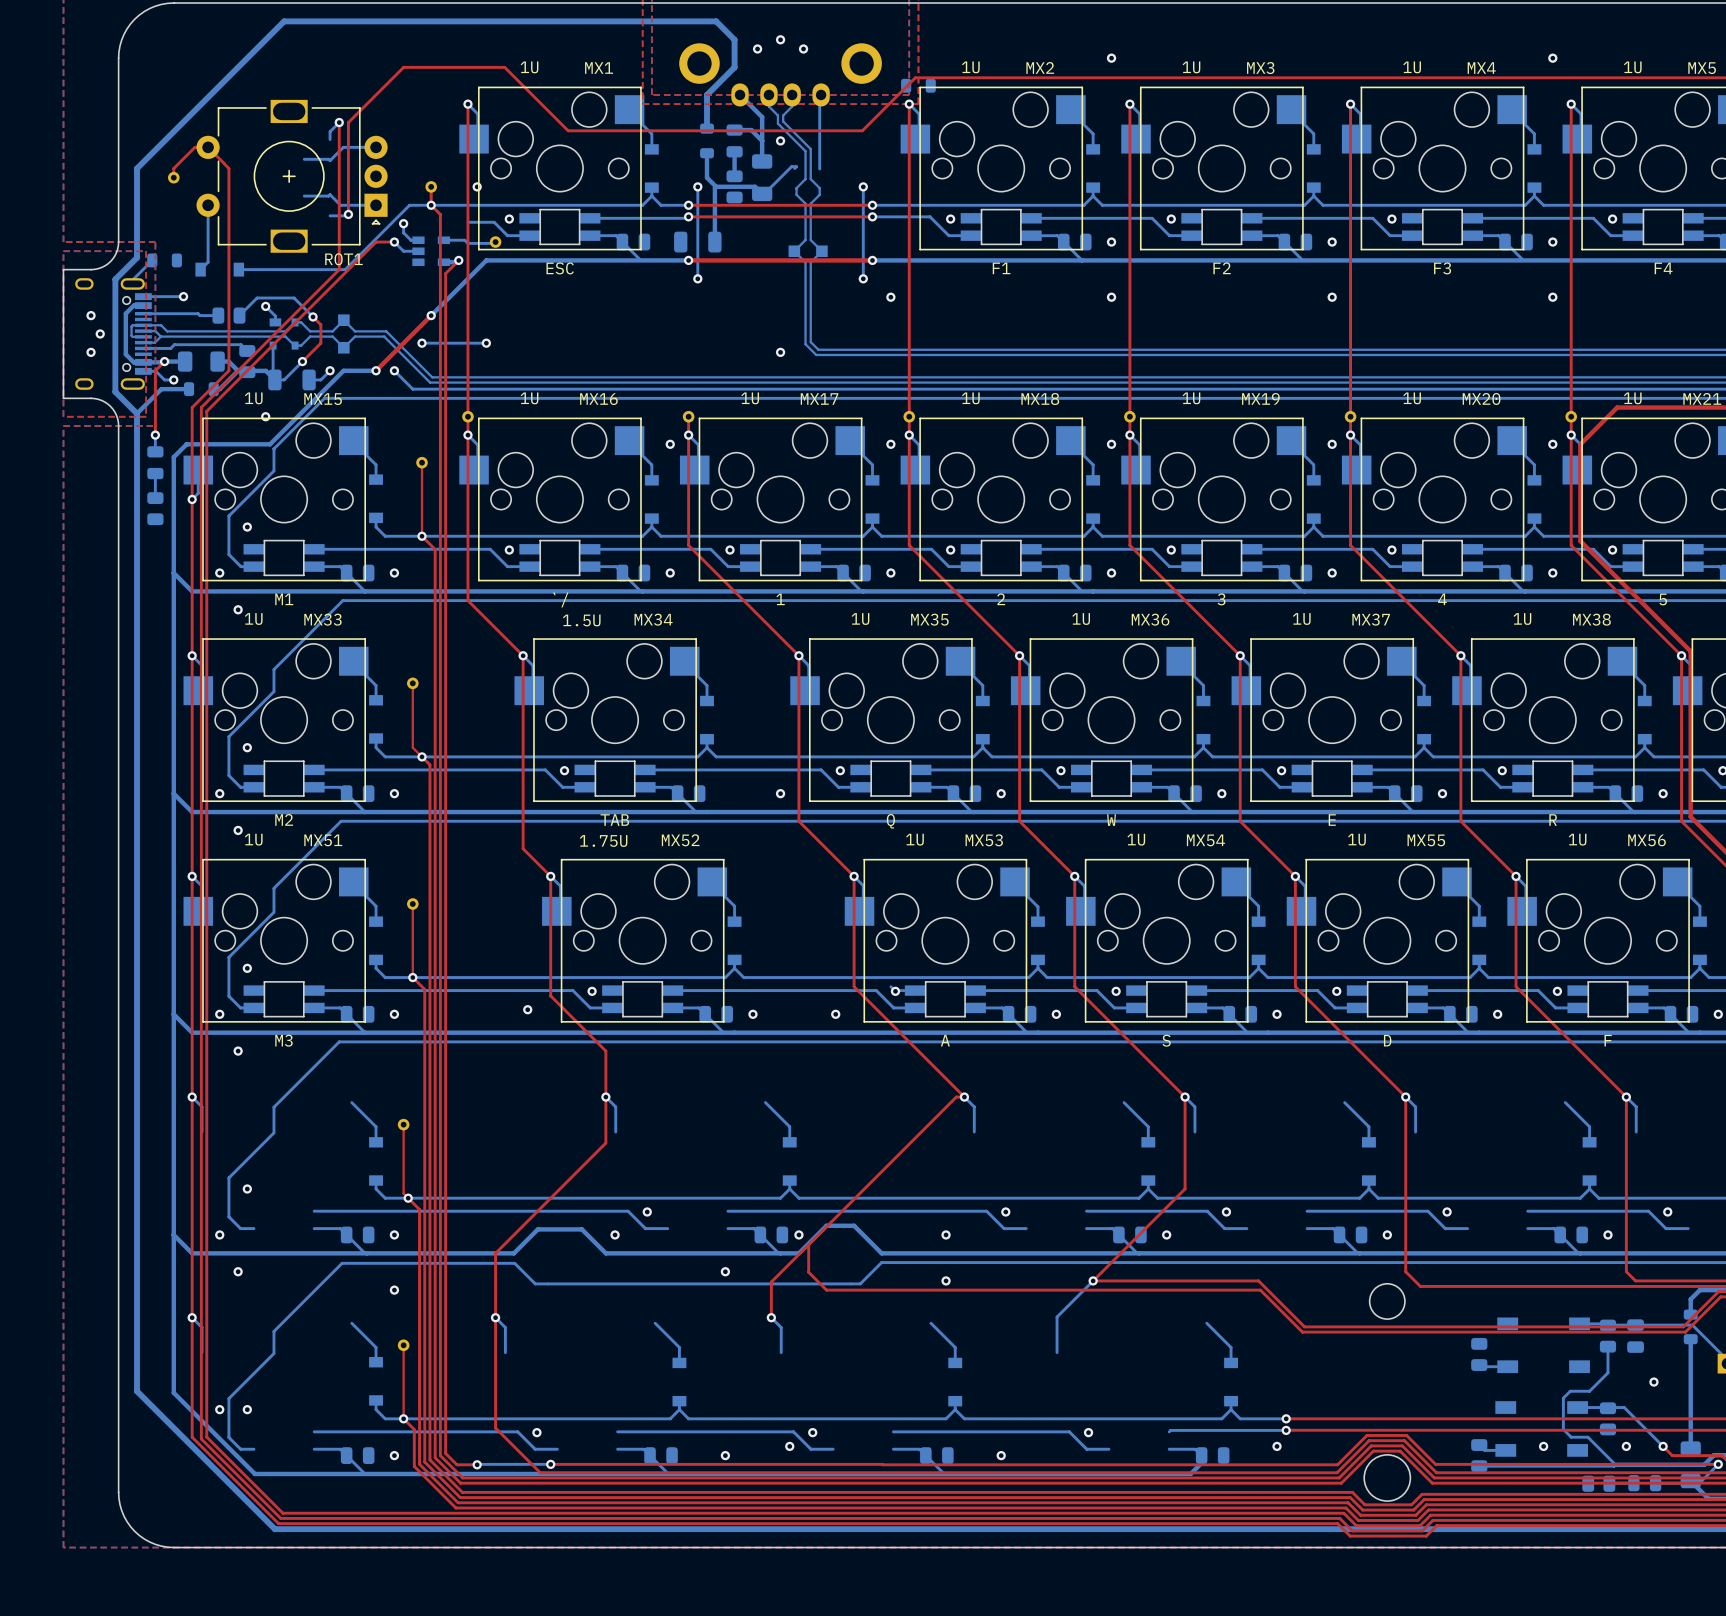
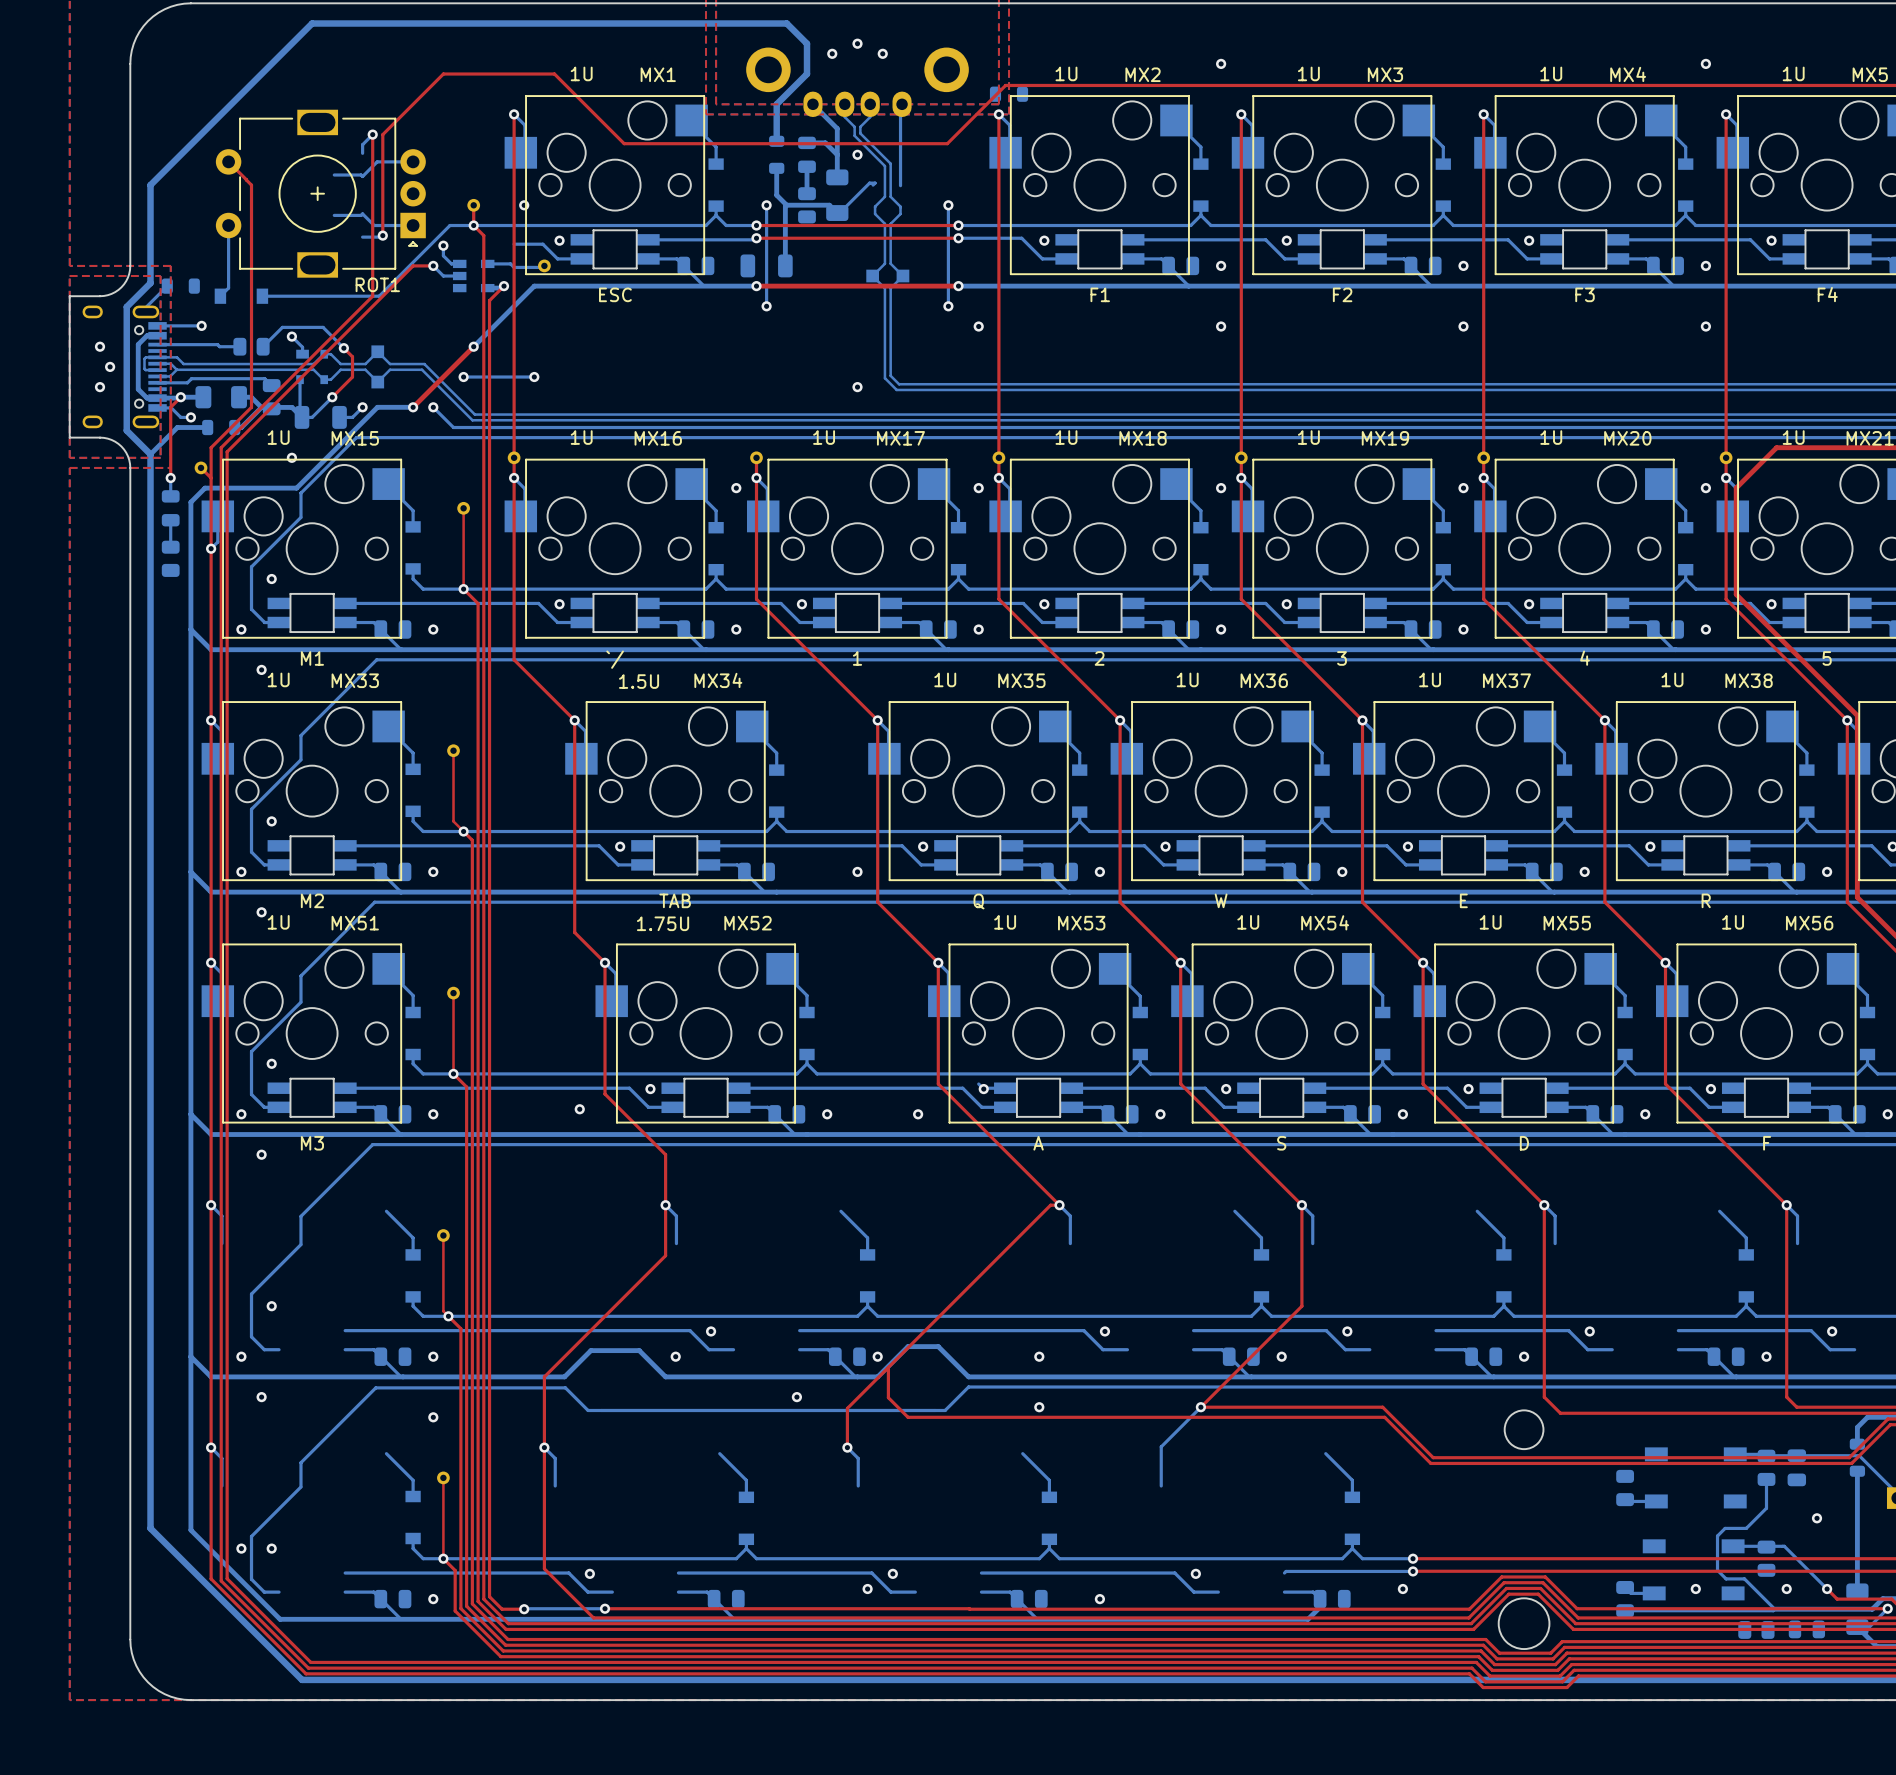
top track: (208, 147) (194, 147) (173, 168) (173, 177) -> none
part position: (173, 177) -> (201, 467)
top track: none -> (201, 467) (211, 478)
via: (725, 1455) -> none

